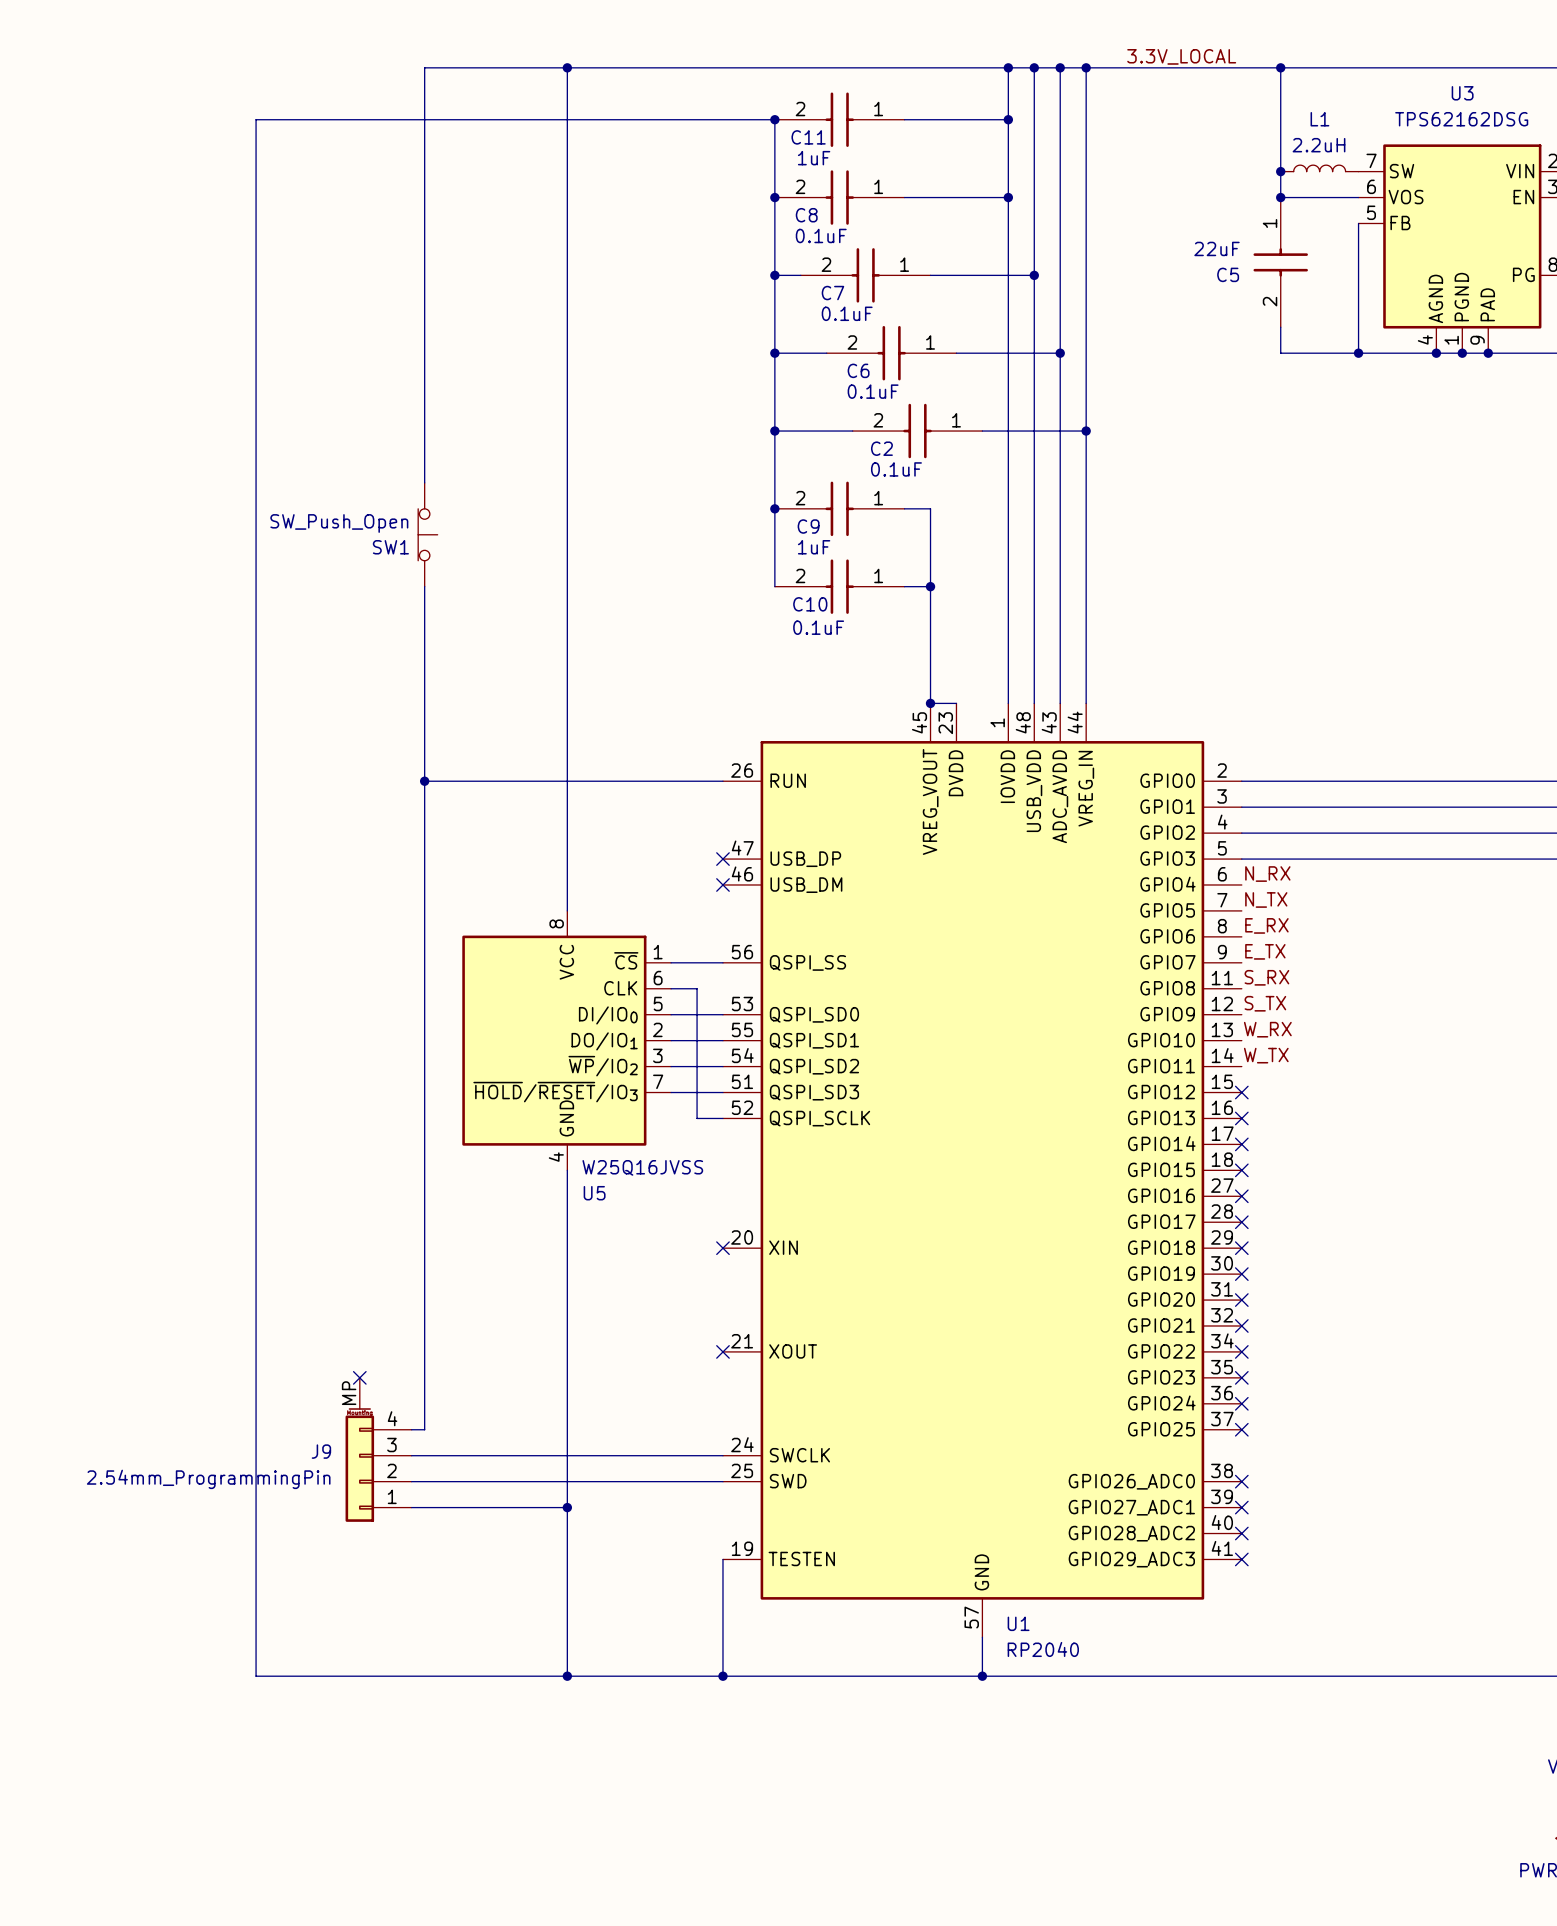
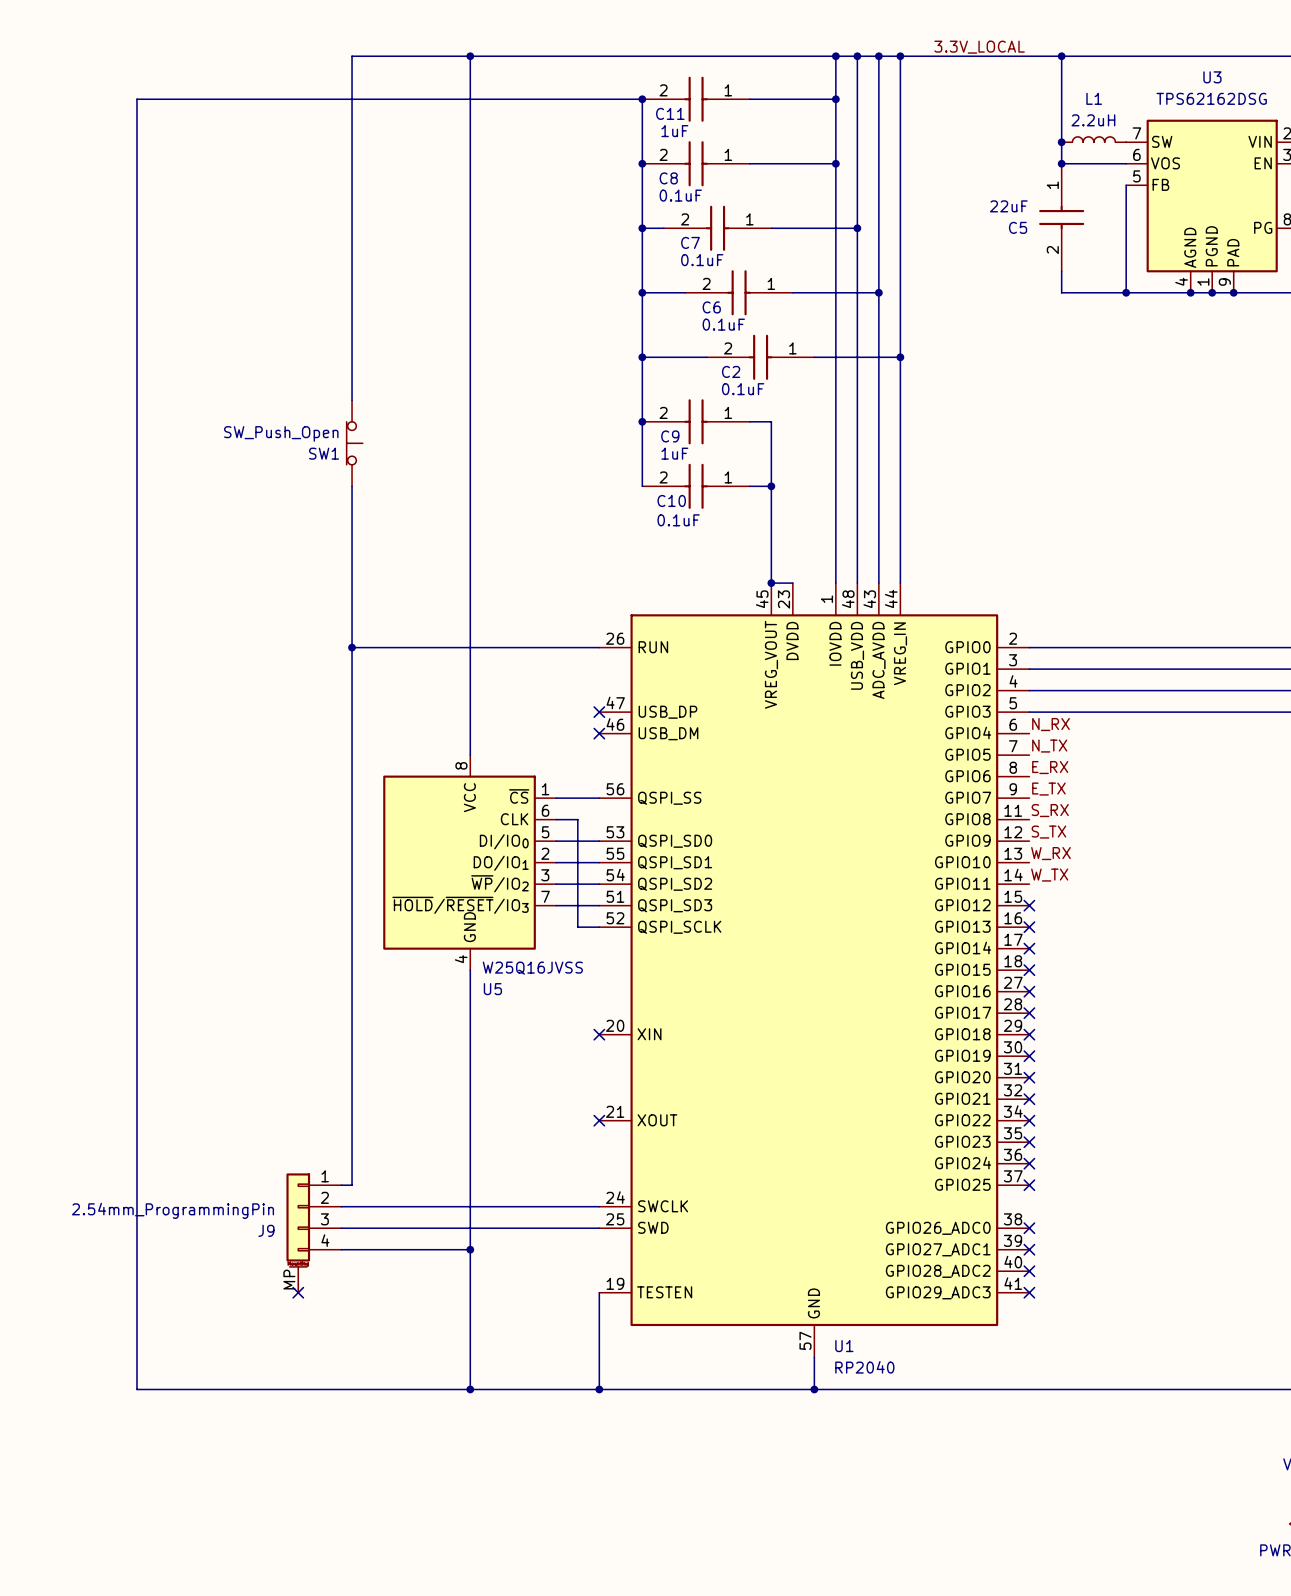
wire: (256, 119) (256, 1676) -> (212, 99) (136, 99) (136, 1389) (212, 1389)
no-connect mark: (359, 1377) -> none
J9 flip: as is (359, 1465) -> up-down (298, 1220)
no-connect mark: none -> (298, 1292)

